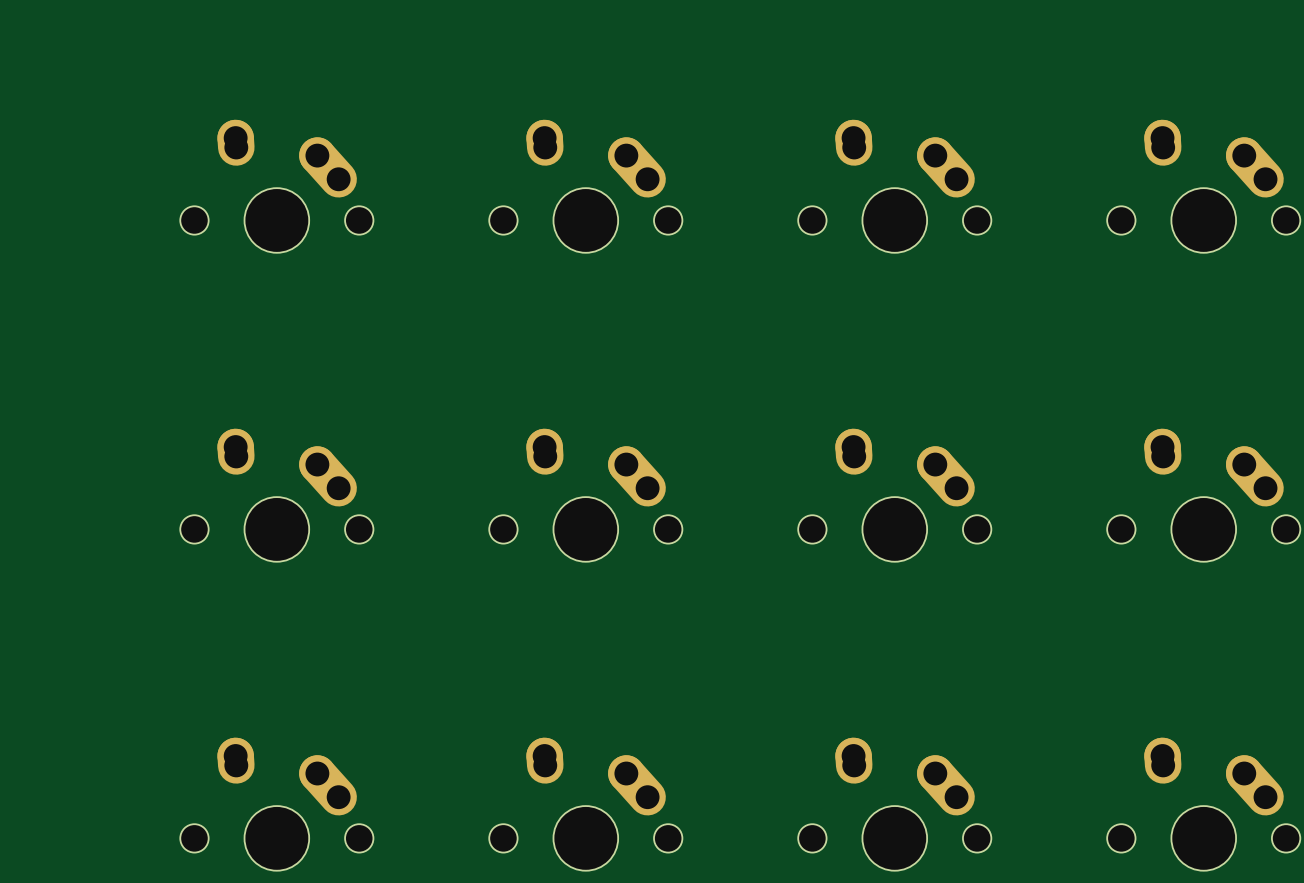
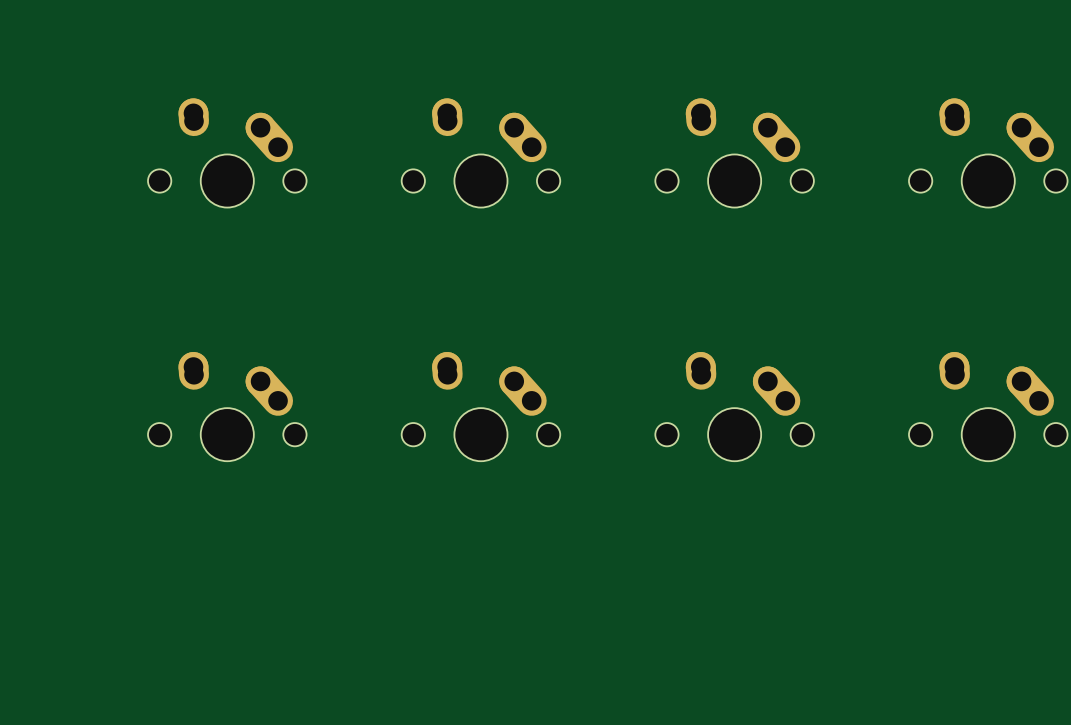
part: (276, 804) -> none
part: (585, 804) -> none
part: (894, 804) -> none
part: (1203, 804) -> none

